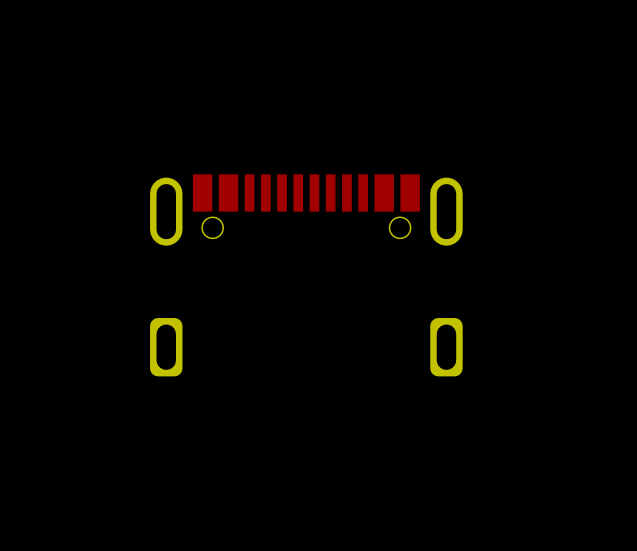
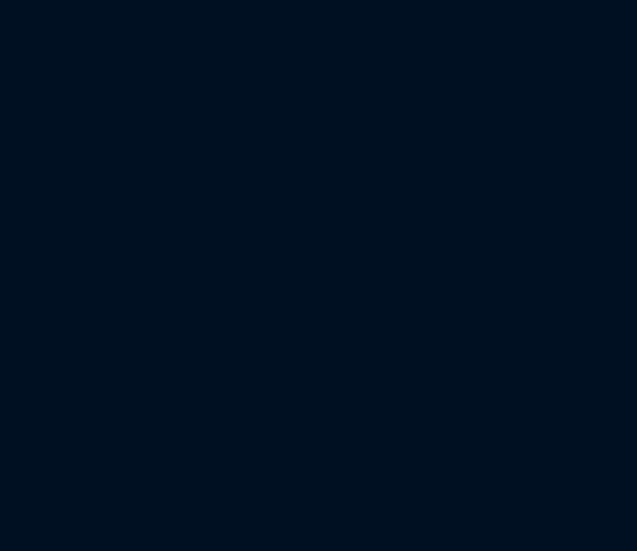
part: (306, 275) -> none

